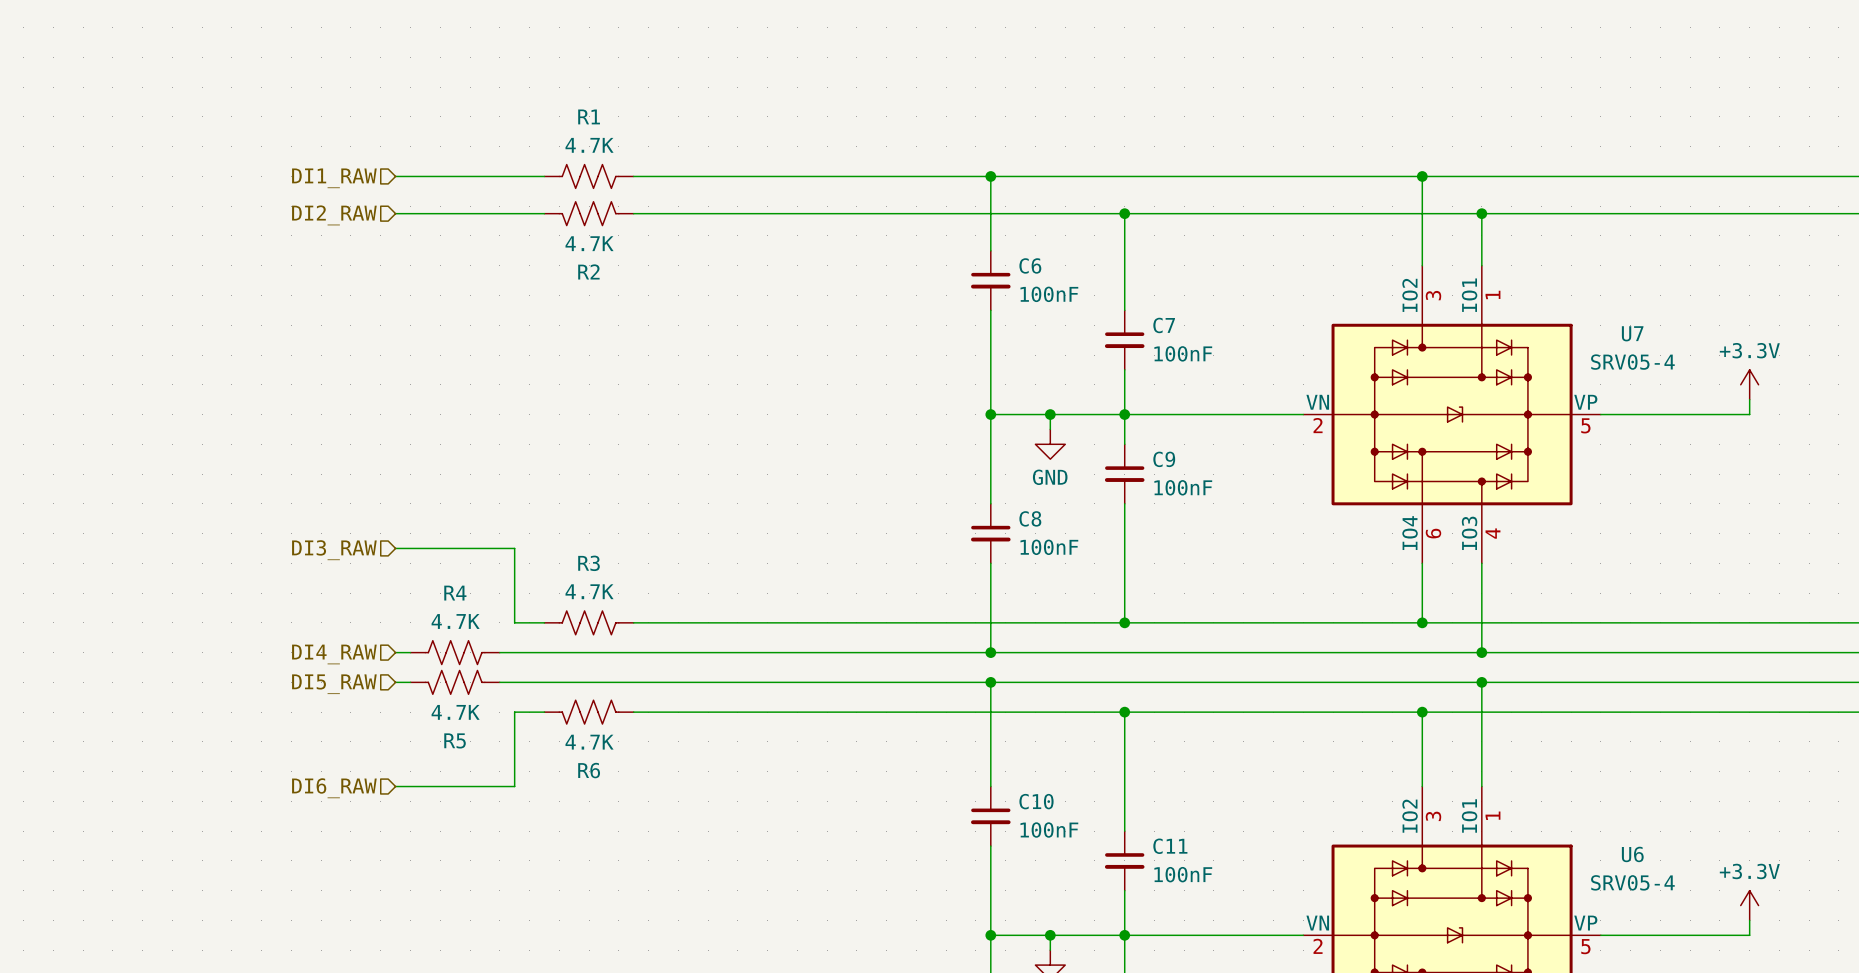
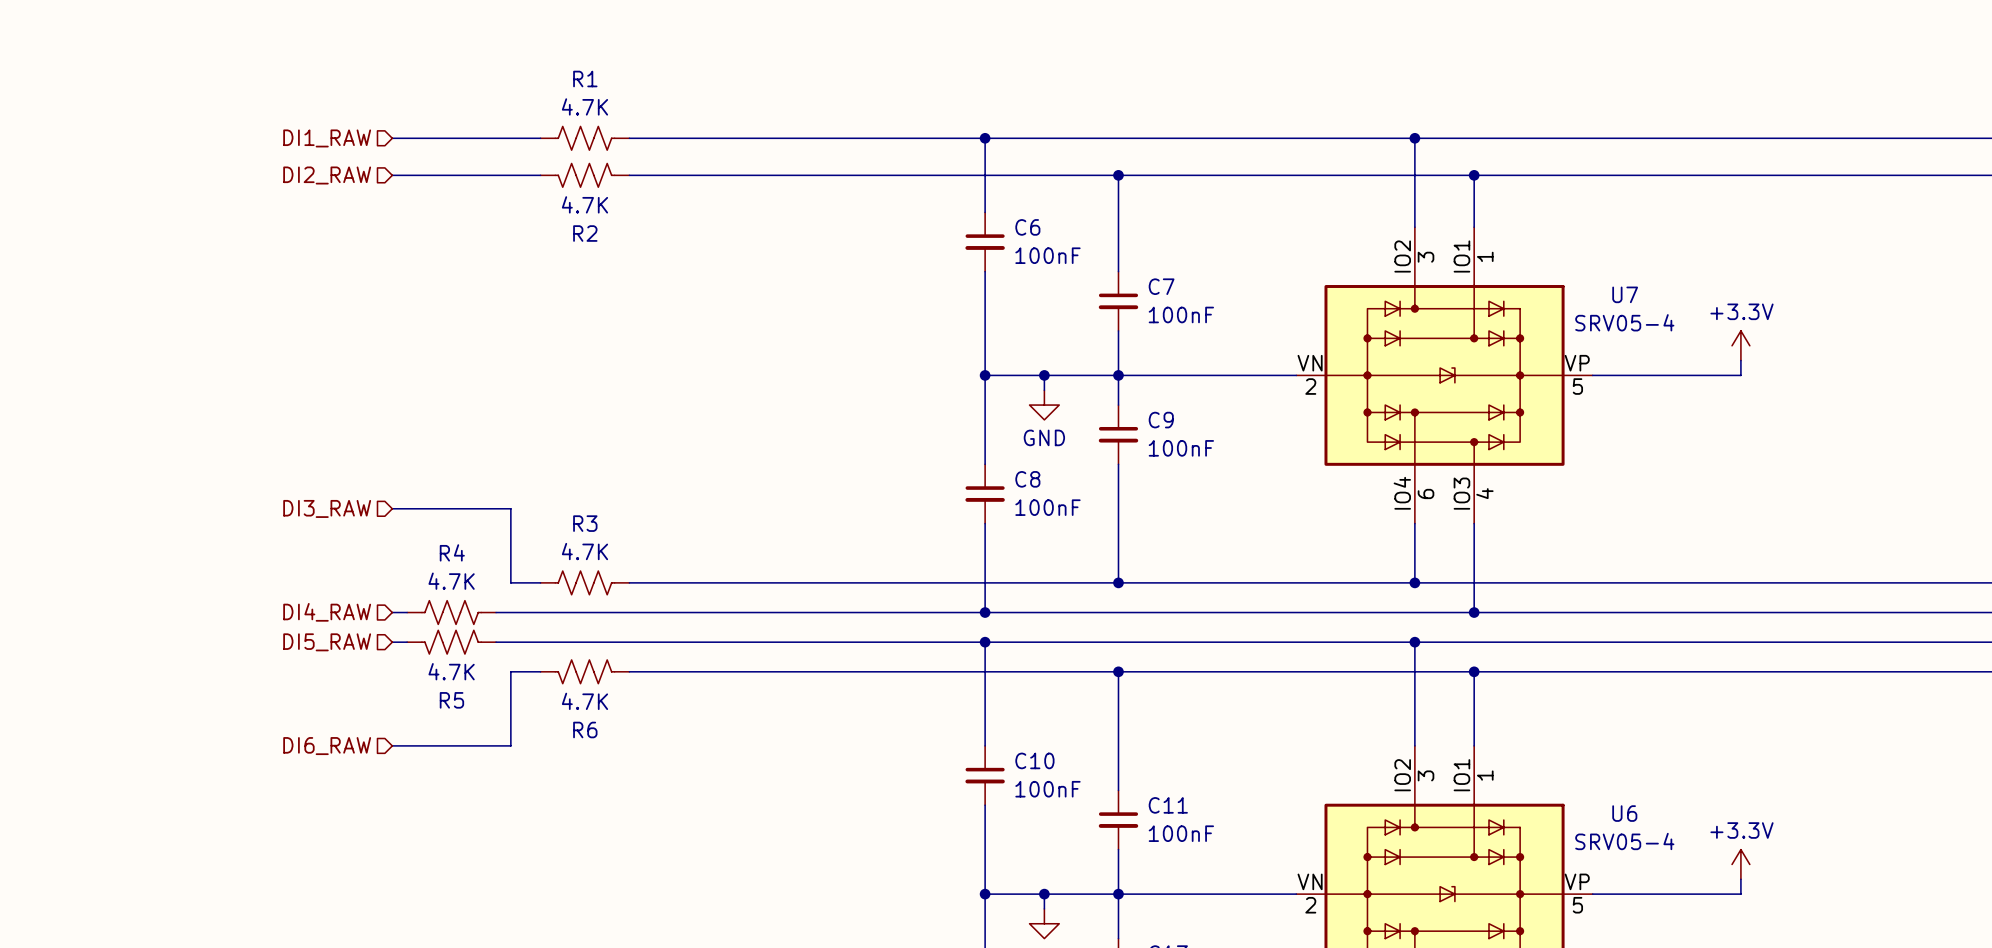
junction: none -> (1414, 642)
wire: (1481, 682) (1481, 712) -> (1414, 642) (1414, 671)
junction: (1481, 682) -> none
junction: (1422, 712) -> none
junction: none -> (1474, 671)

